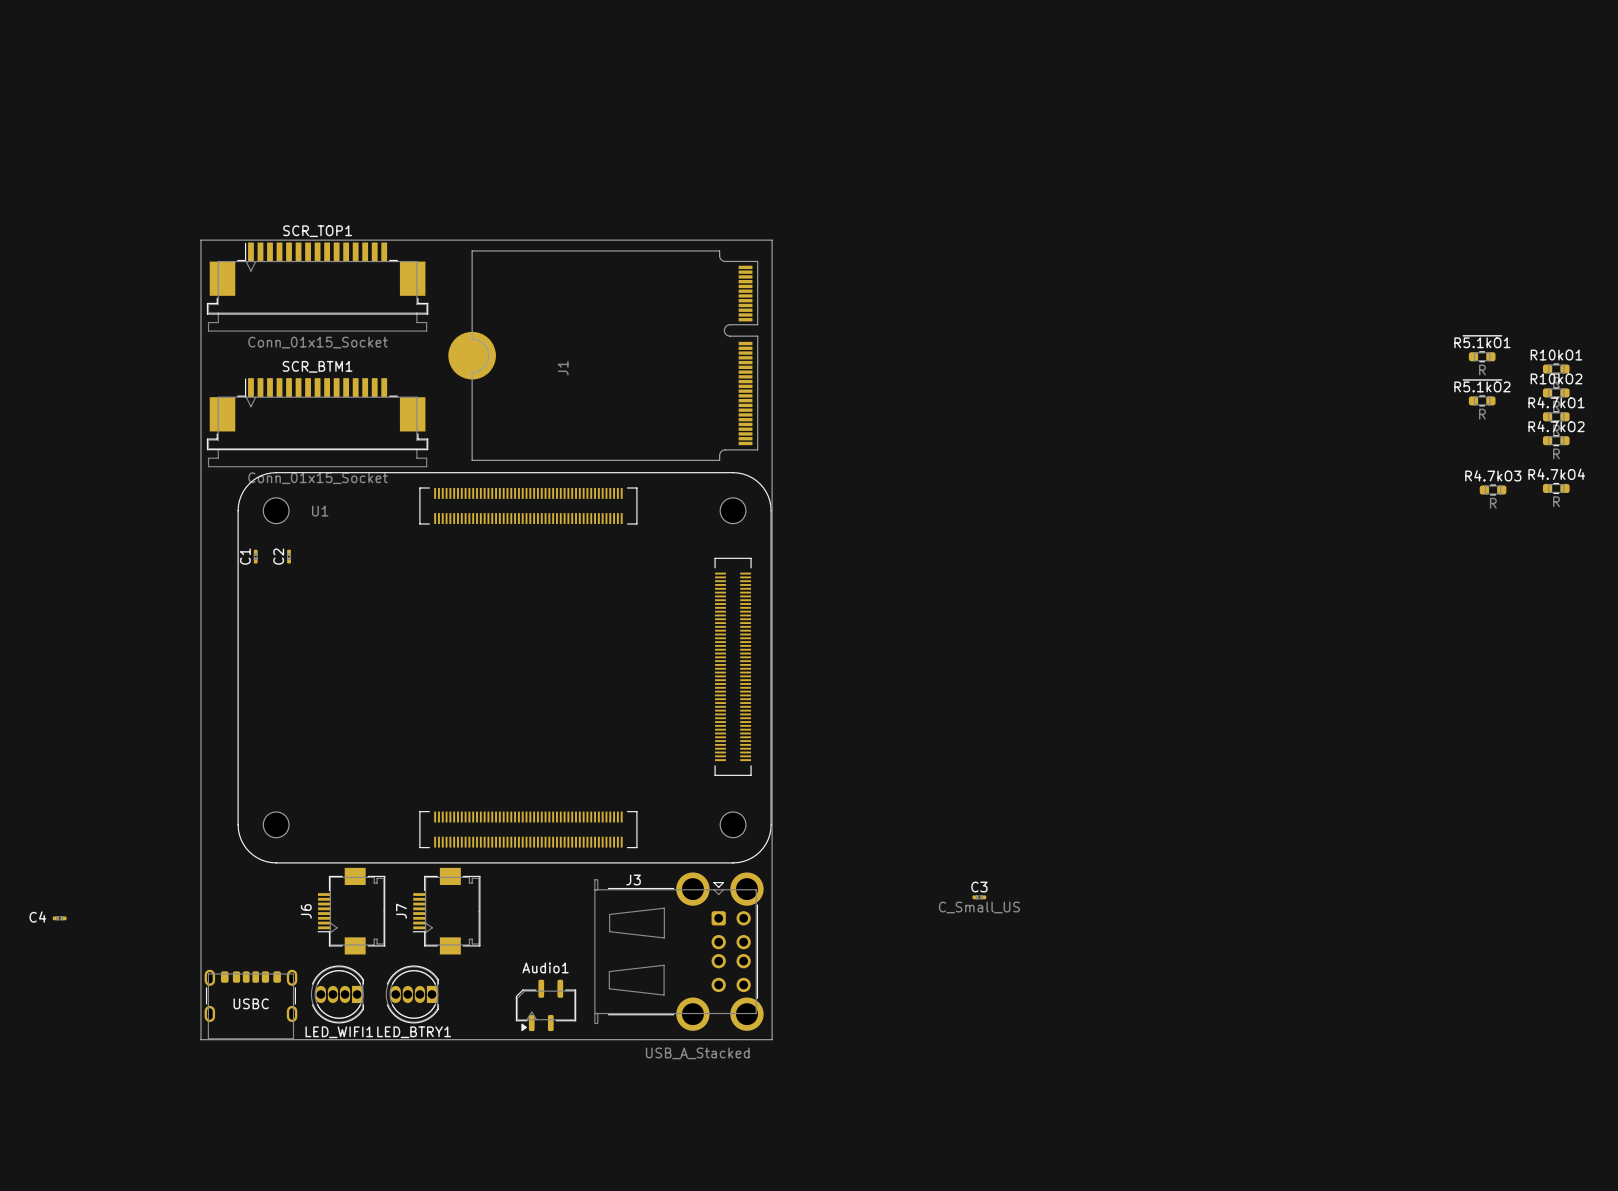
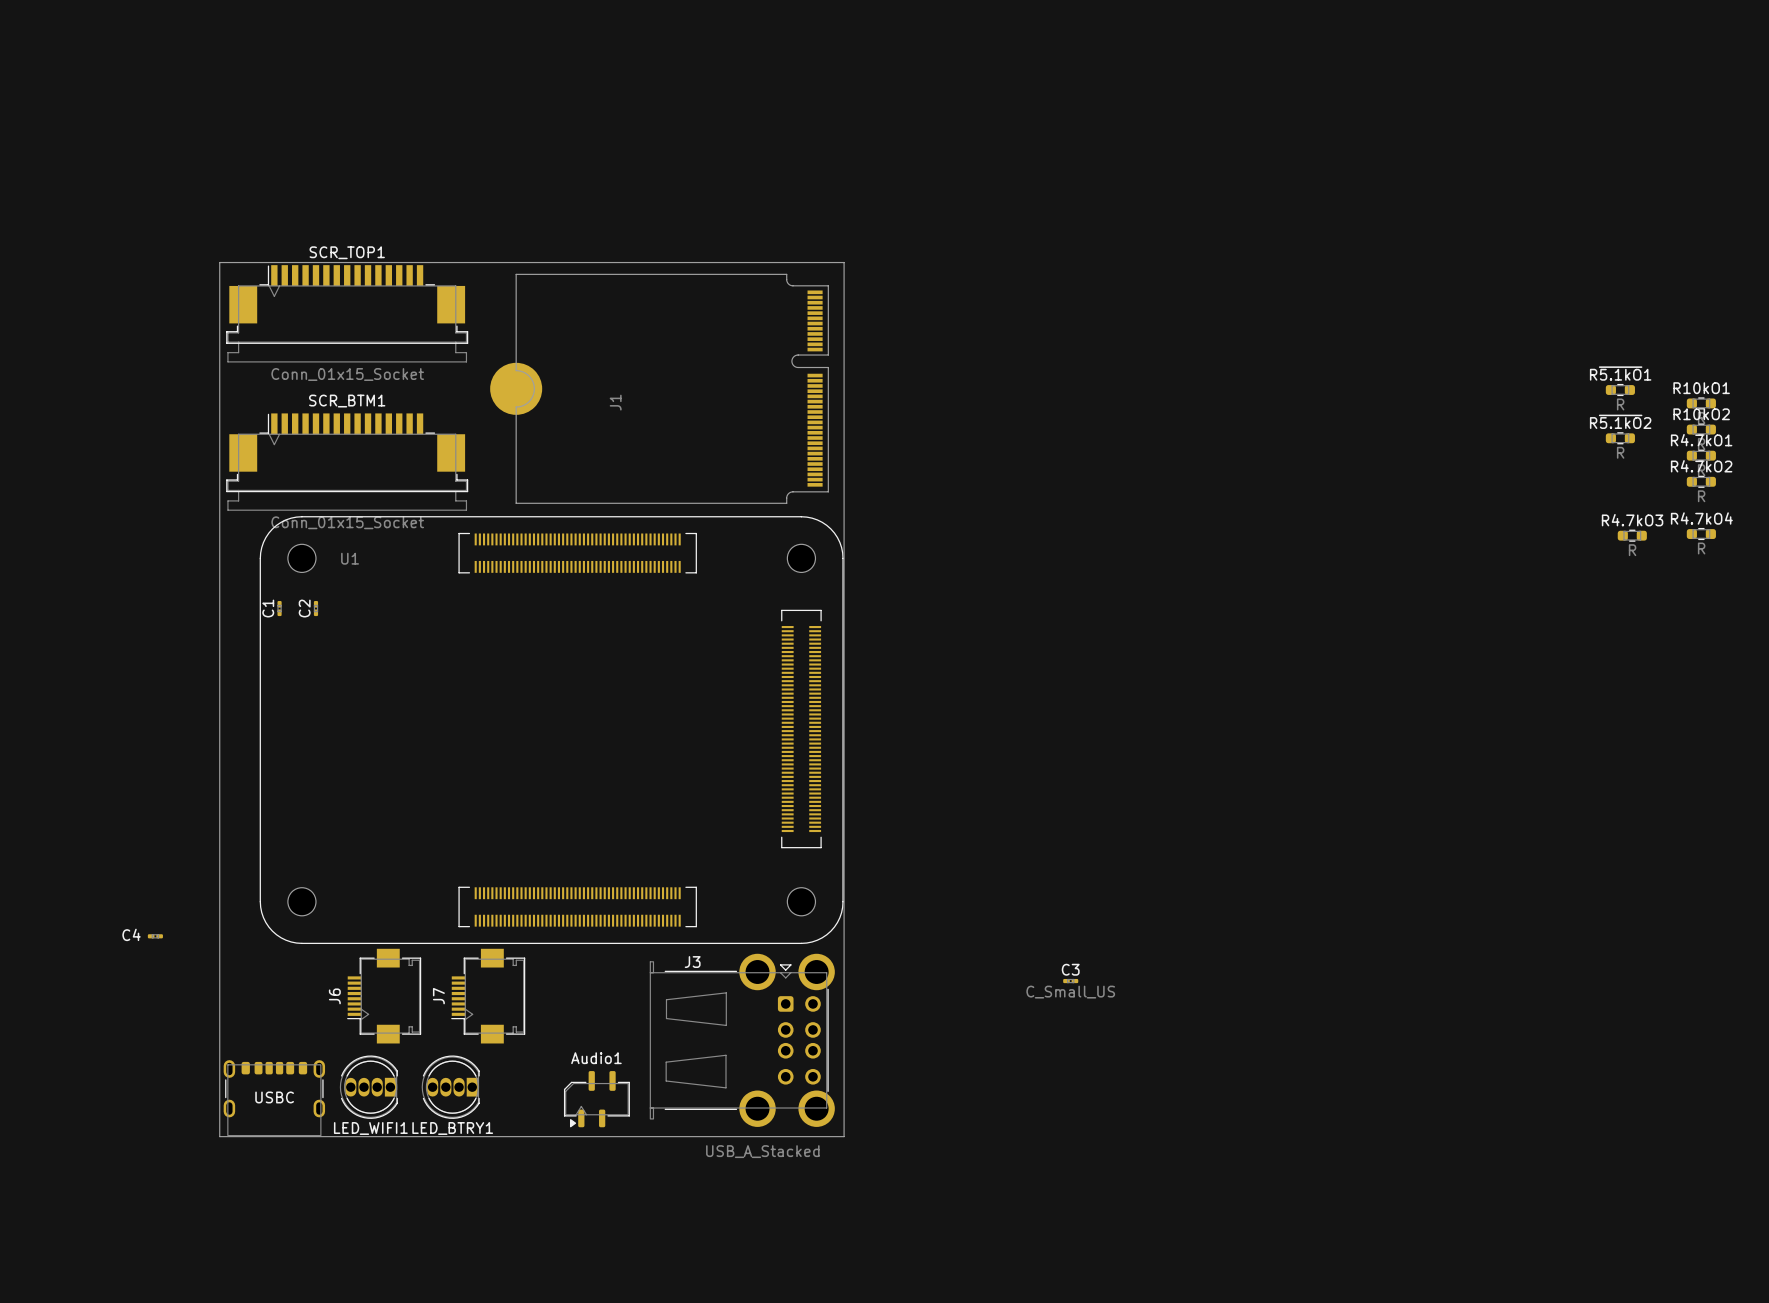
C4 position: (59, 918) -> (155, 936)

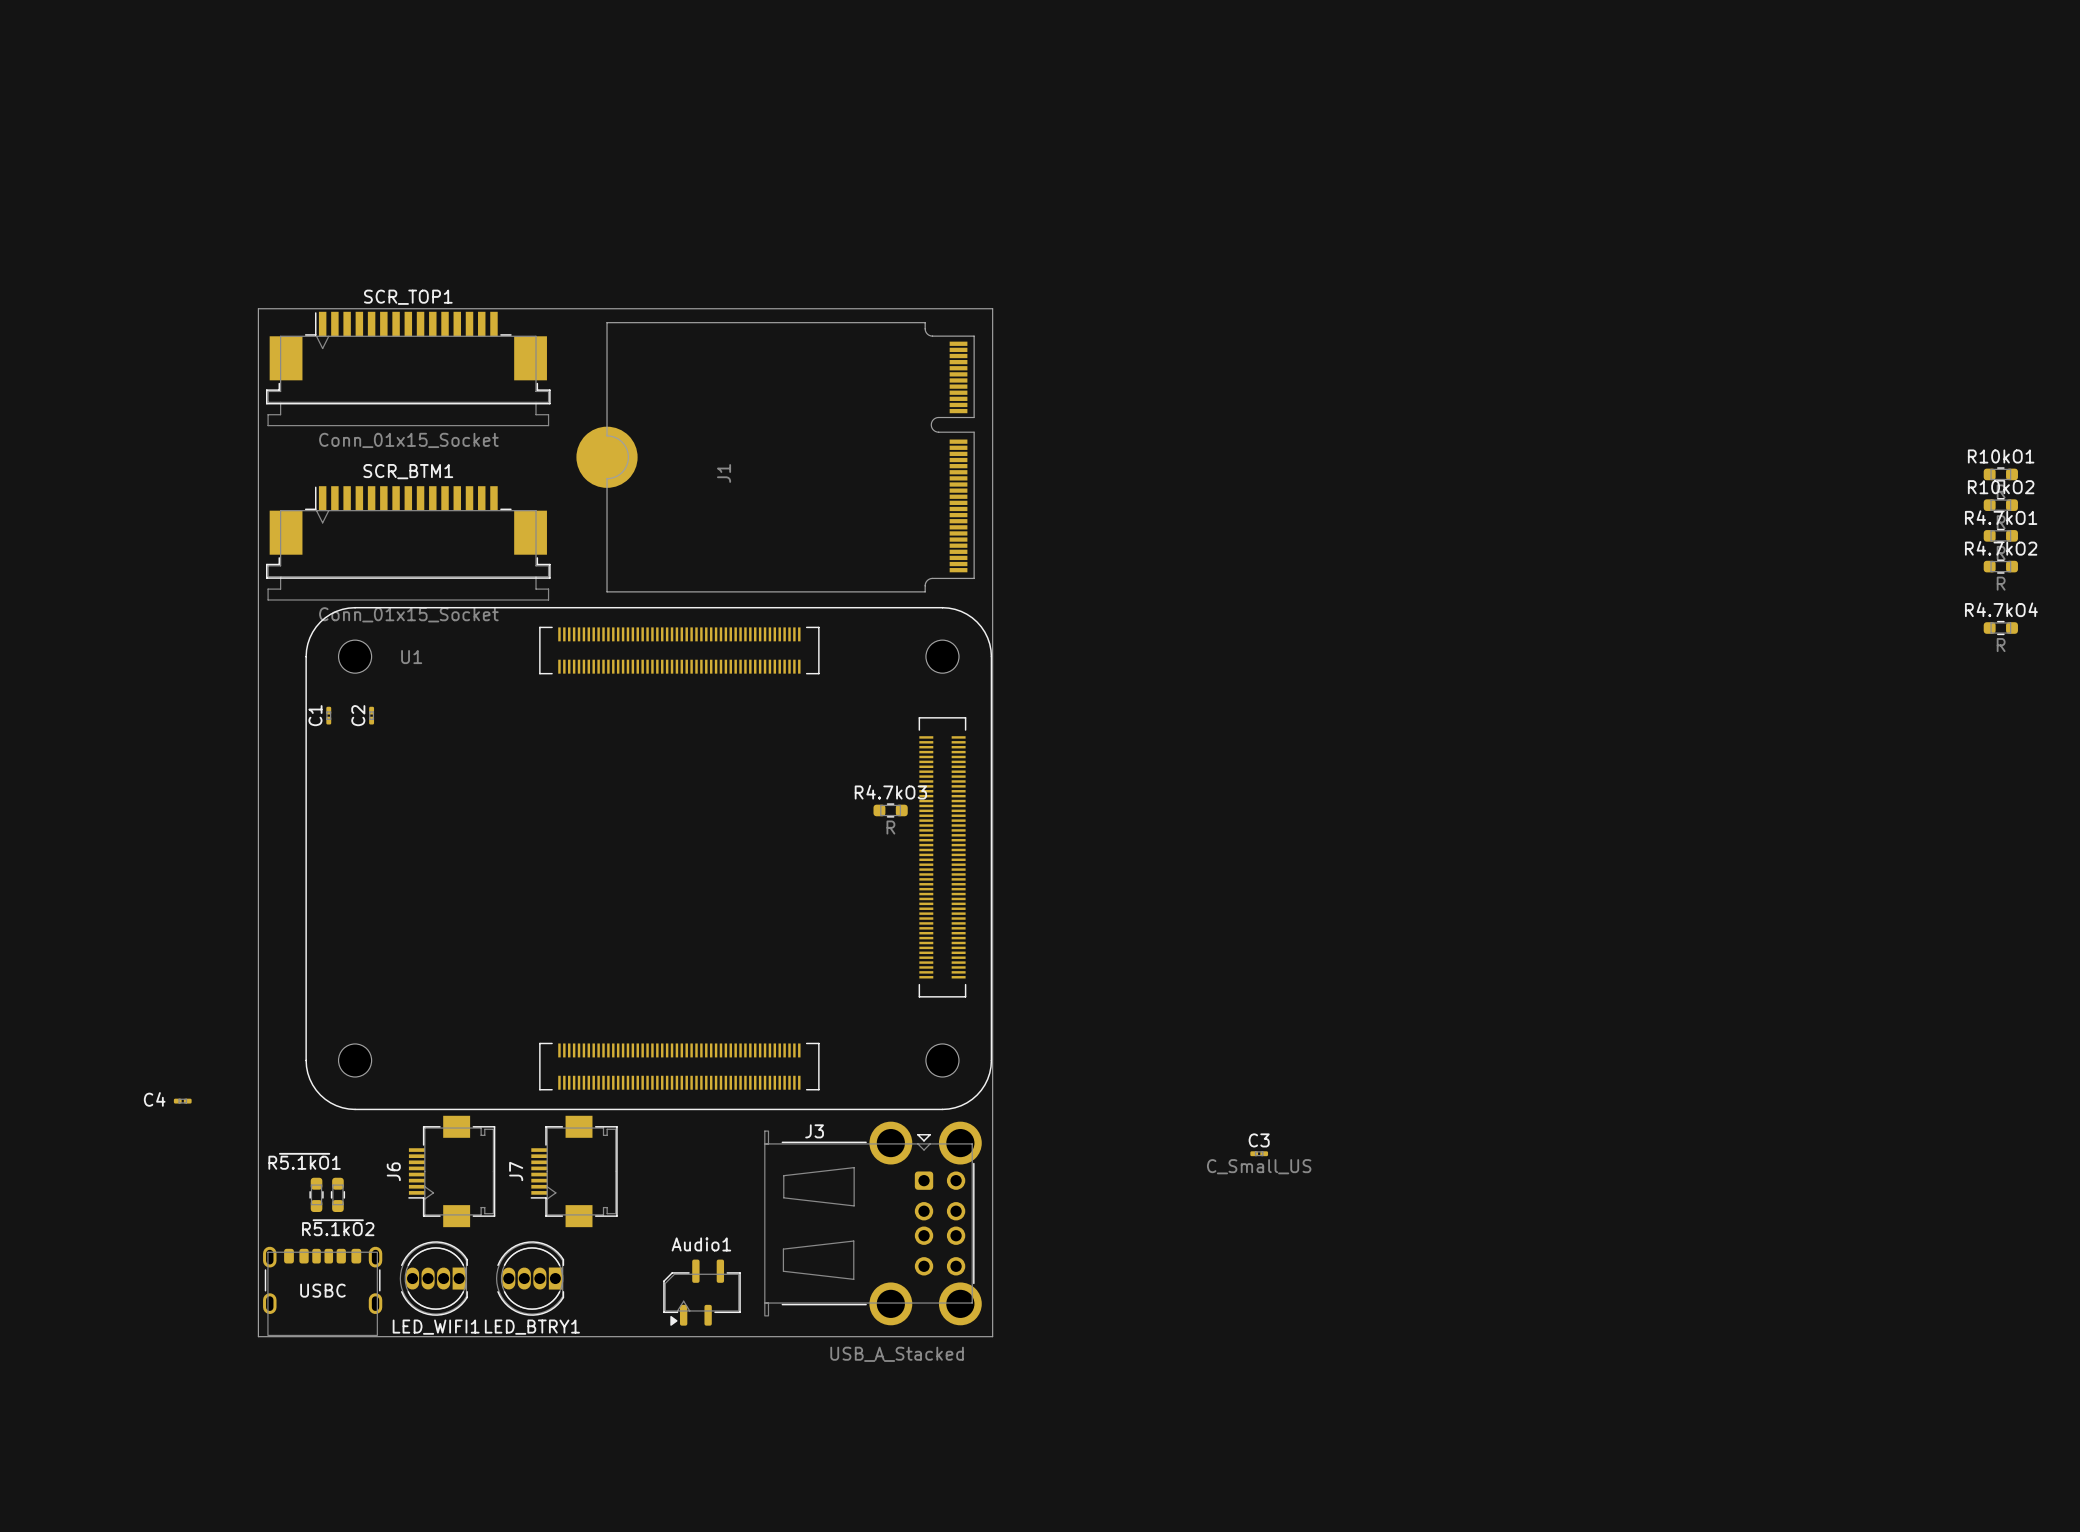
R~{5.1kO}1 rotation: 0° (1620, 390) -> 90° clockwise (316, 1194)
R~{5.1kO}1 position: (1620, 390) -> (316, 1194)
R~{5.1kO}1 value: R (1620, 404) -> none
R~{5.1kO}2 name position: R~{5.1kO}2 (1620, 421) -> R~{5.1kO}2 (338, 1227)
R~{5.1kO}2 rotation: 0° (1620, 438) -> 90° clockwise (337, 1194)
R~{5.1kO}2 position: (1620, 438) -> (337, 1194)
R~{5.1kO}2 value: R (1620, 452) -> none
R4.7kO3 position: (1632, 535) -> (890, 810)

